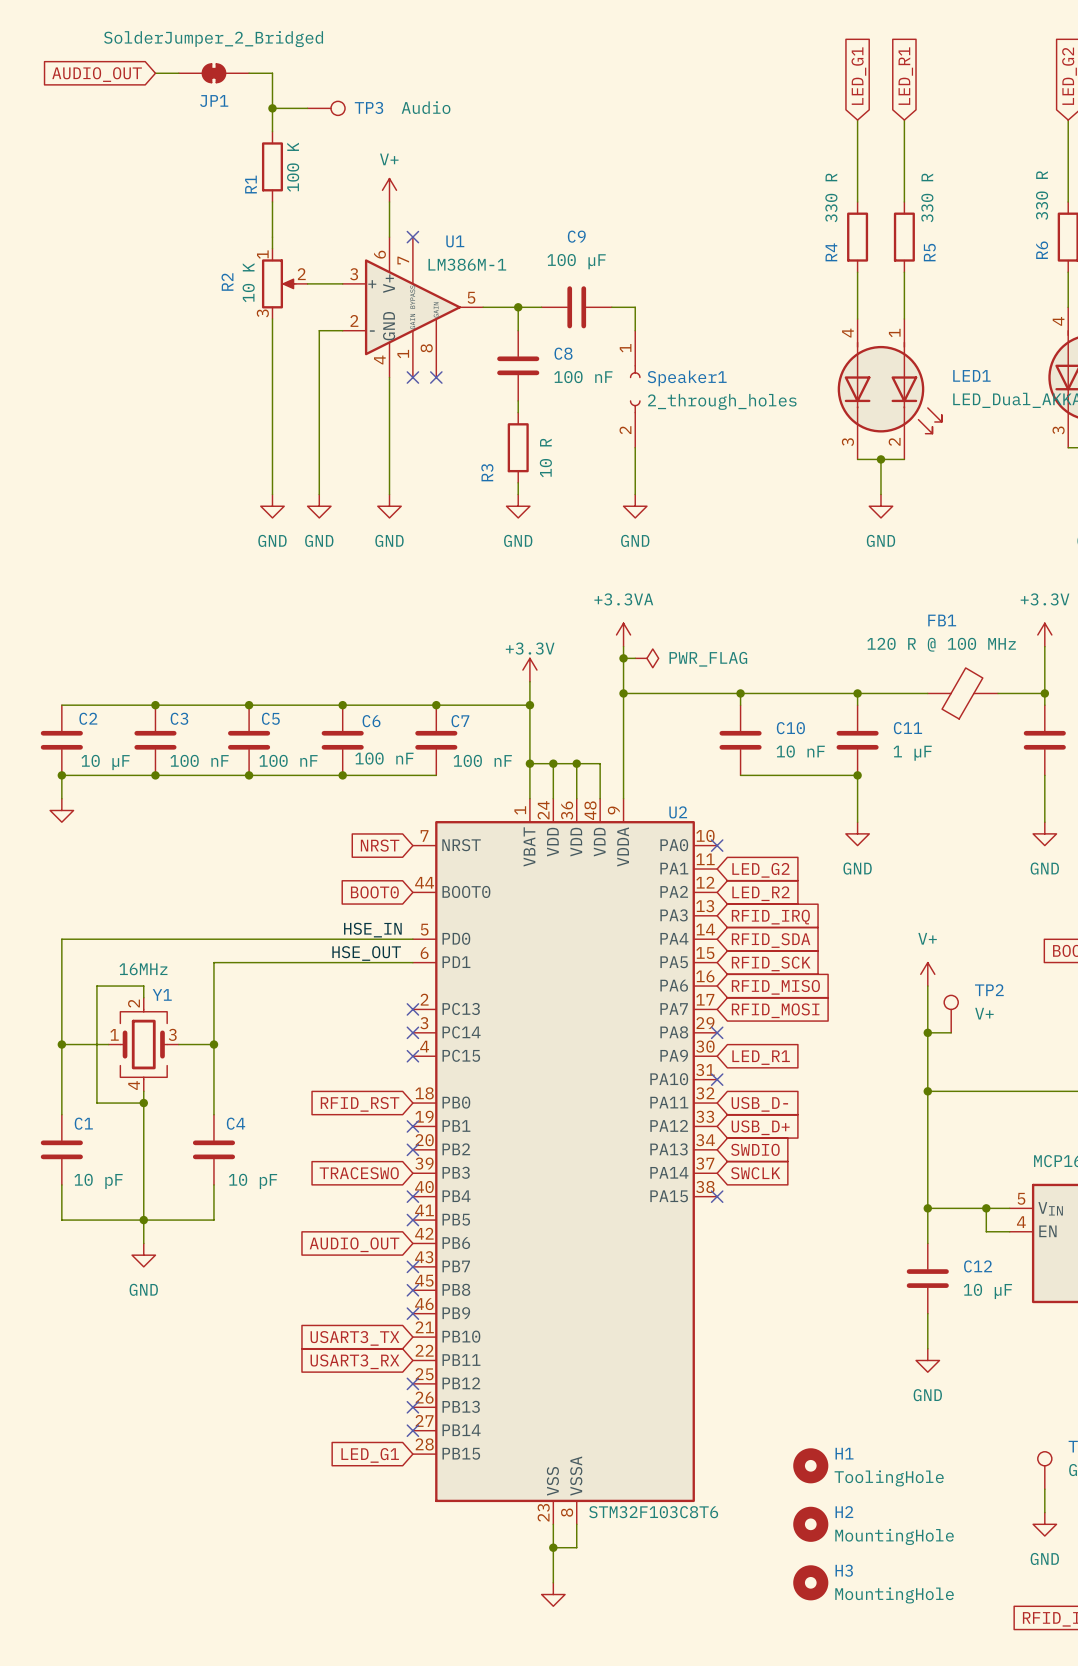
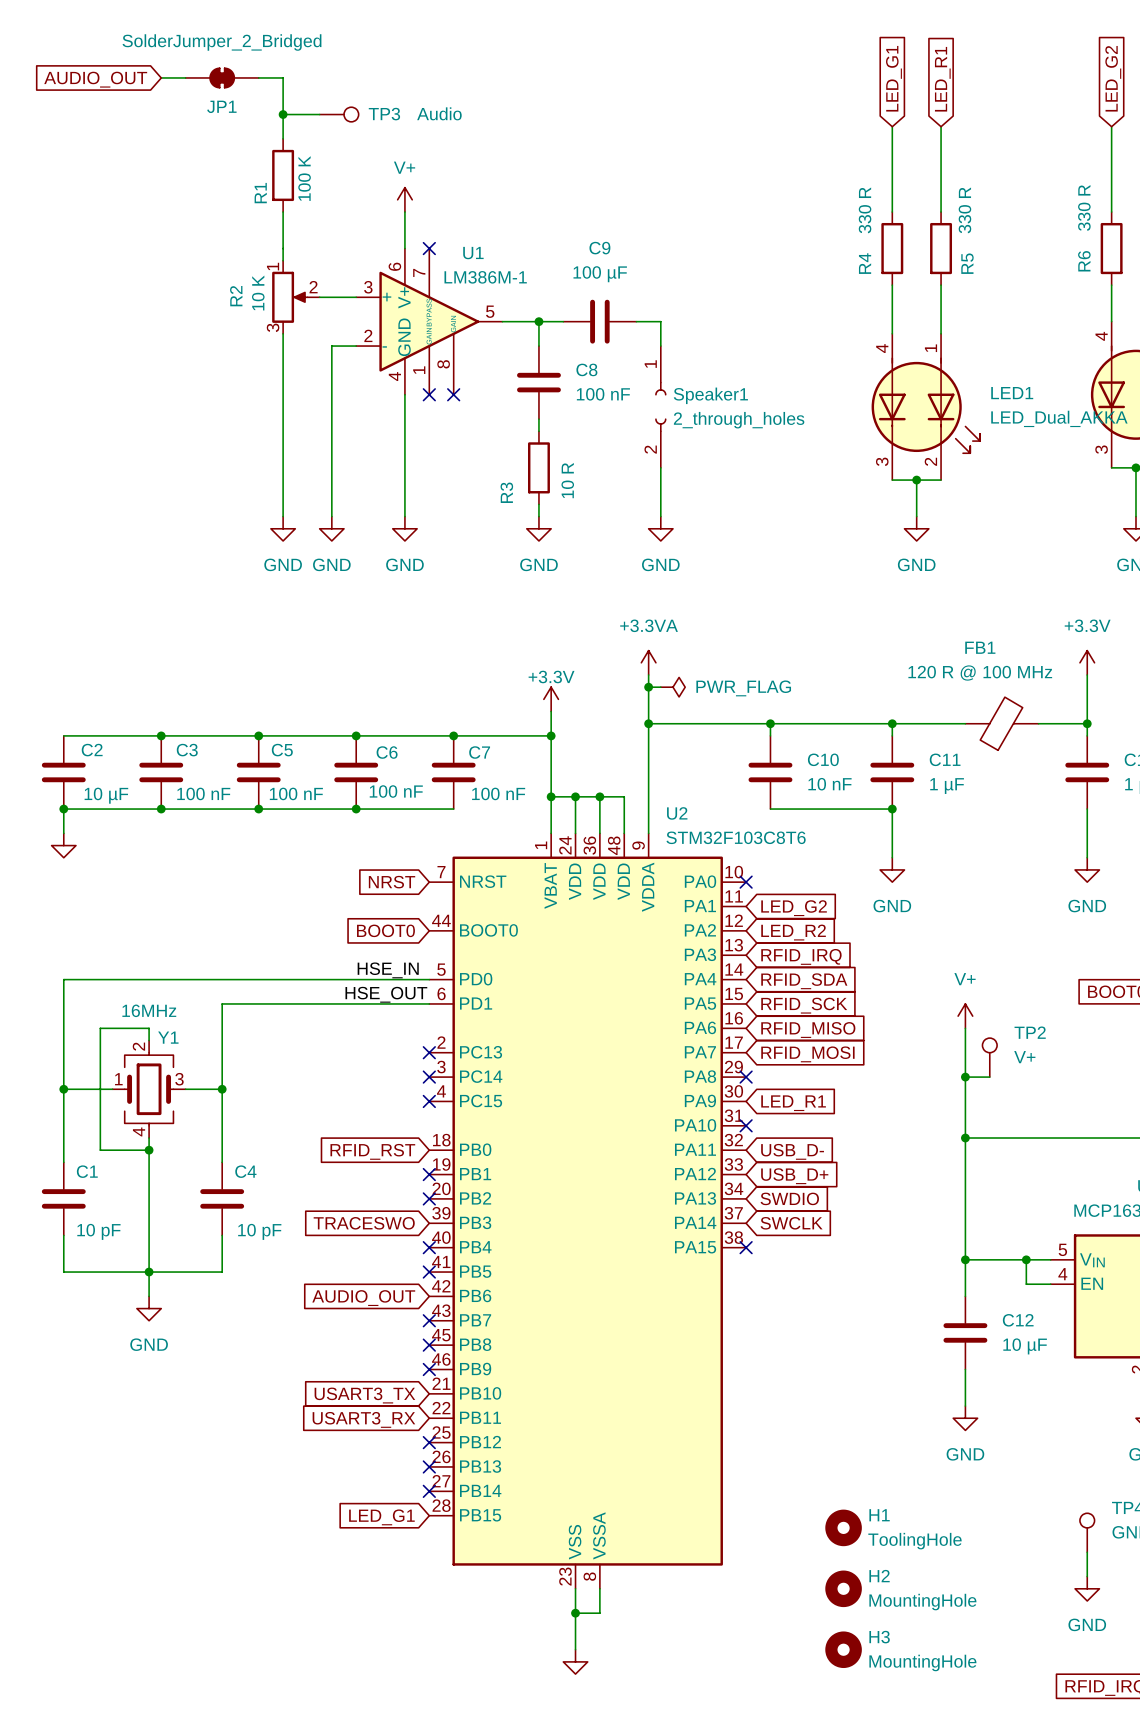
U2 name position: U2 (678, 812) -> U2 (677, 813)
U2 value position: STM32F103C8T6 (653, 1512) -> STM32F103C8T6 (736, 837)

